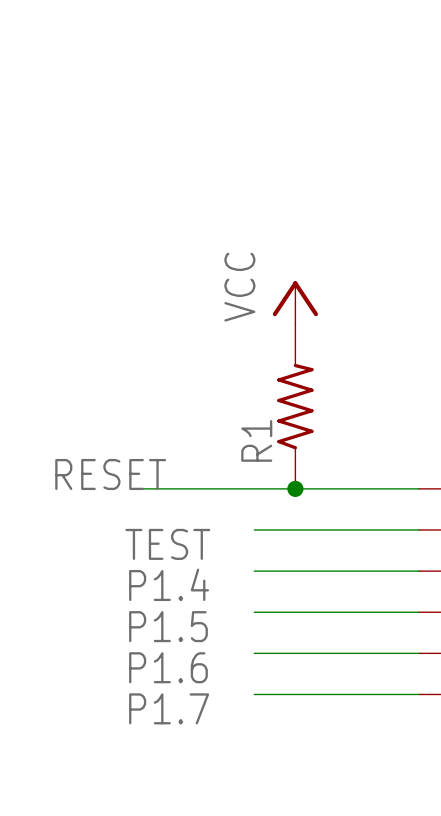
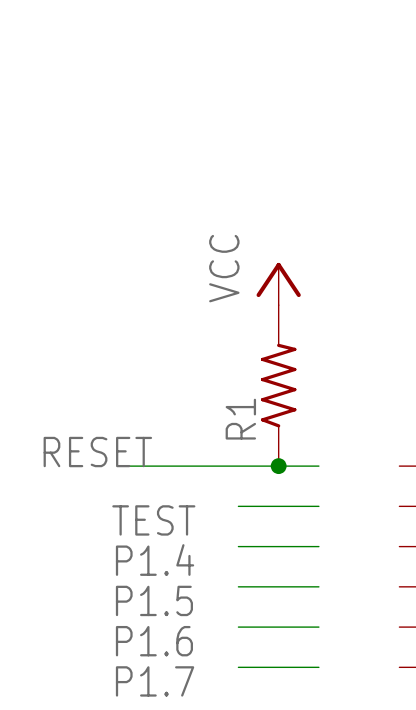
wire: (336, 488) (418, 488) -> none
wire: (336, 530) (418, 530) -> none
wire: (336, 571) (418, 571) -> none
wire: (336, 612) (418, 612) -> none
wire: (336, 653) (418, 653) -> none
wire: (336, 694) (418, 694) -> none

